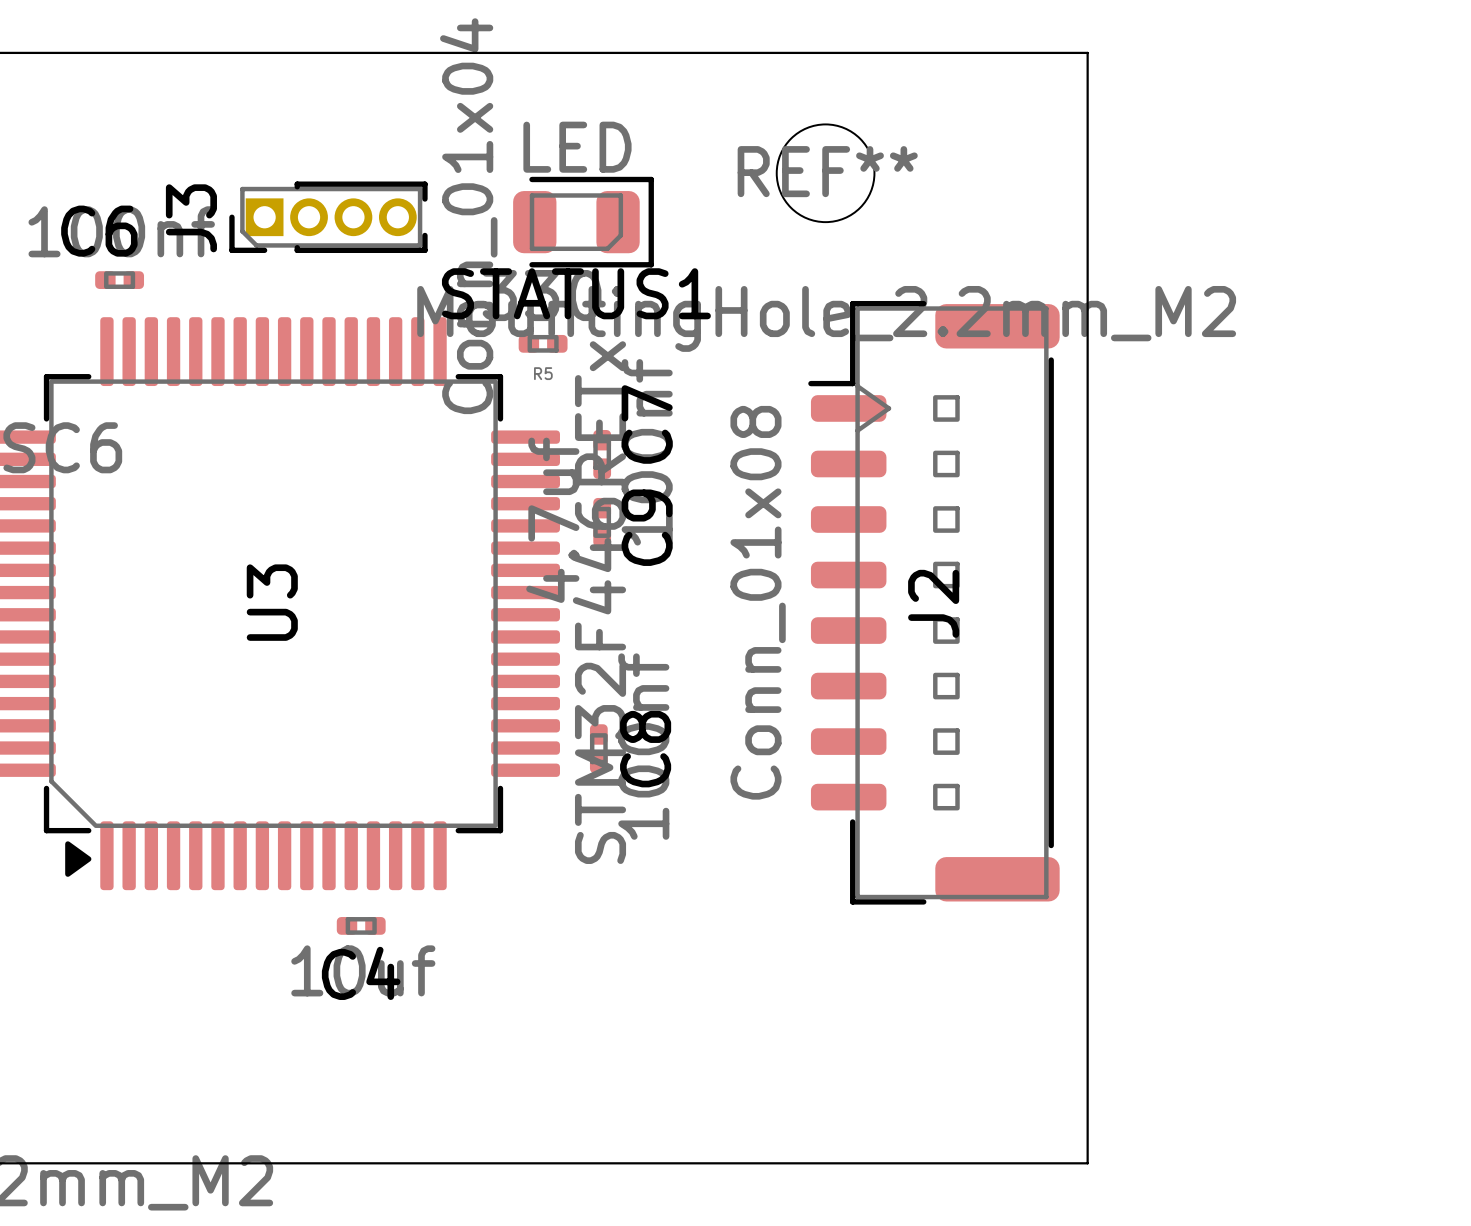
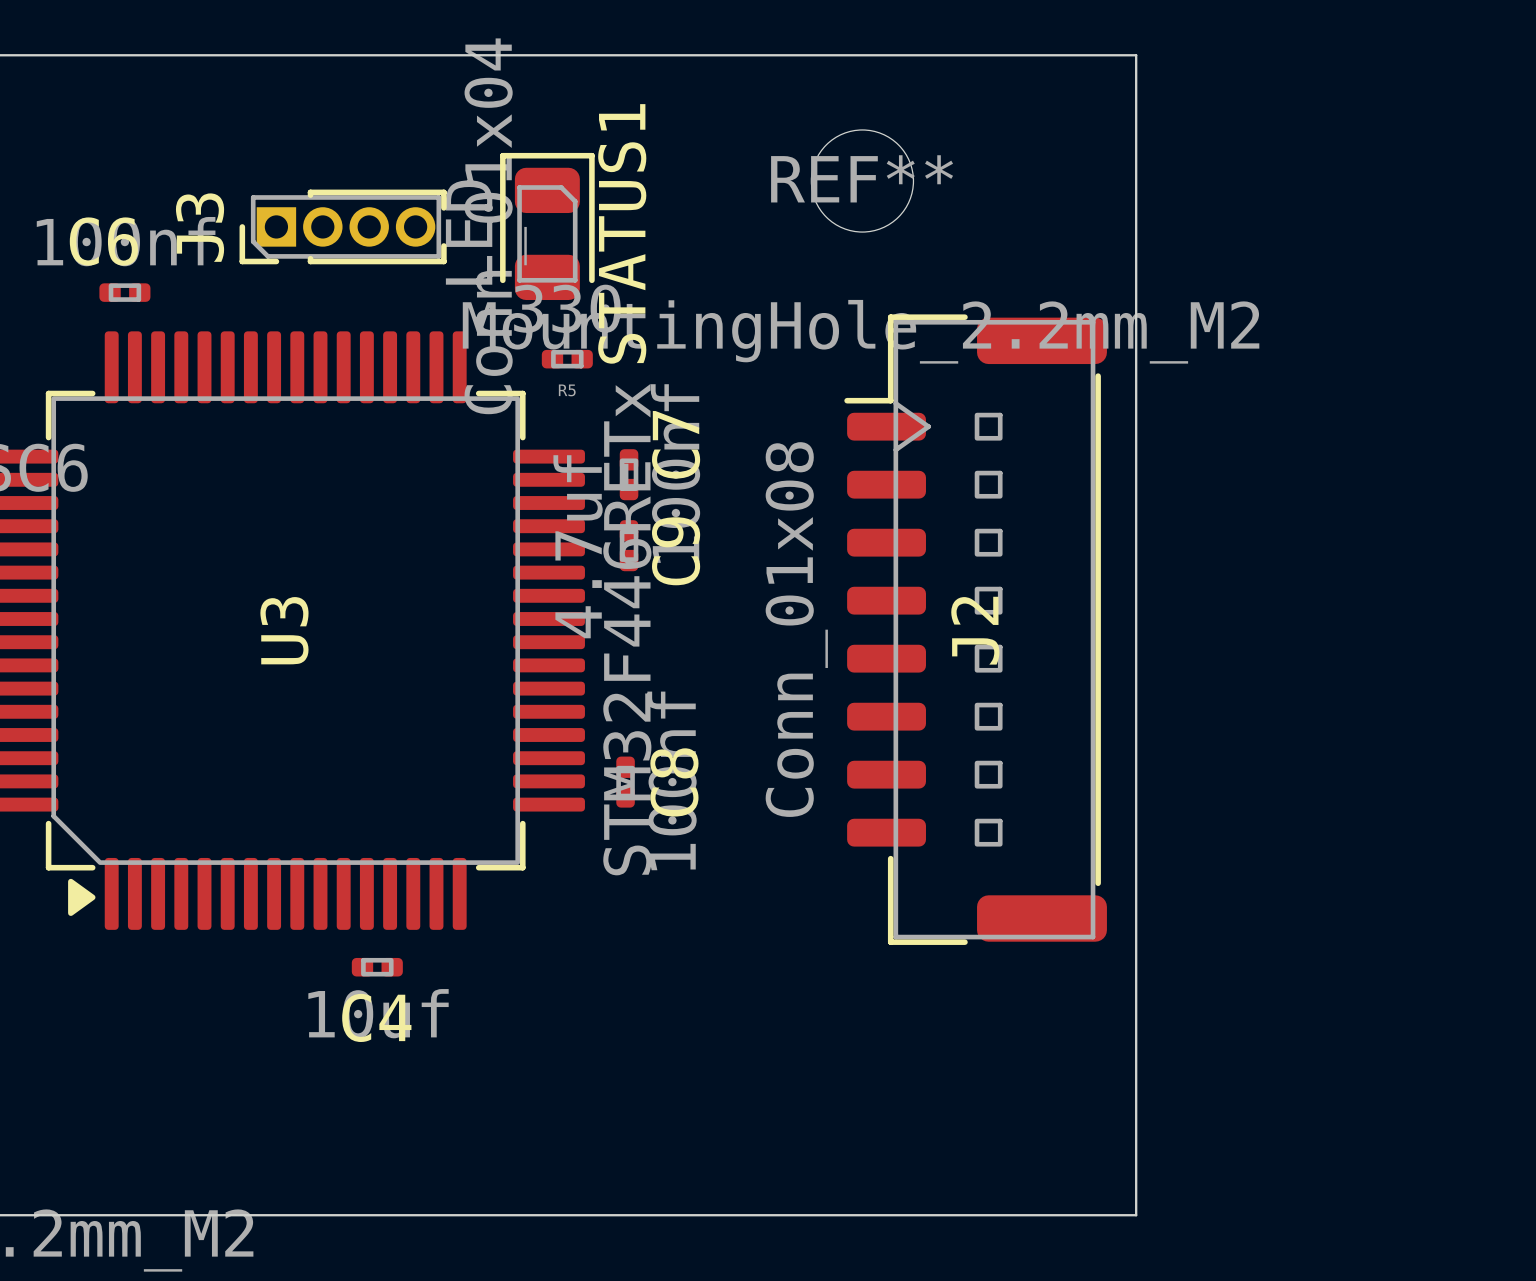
STATUS1 rotation: 0° (583, 222) -> 90° counterclockwise (547, 226)

